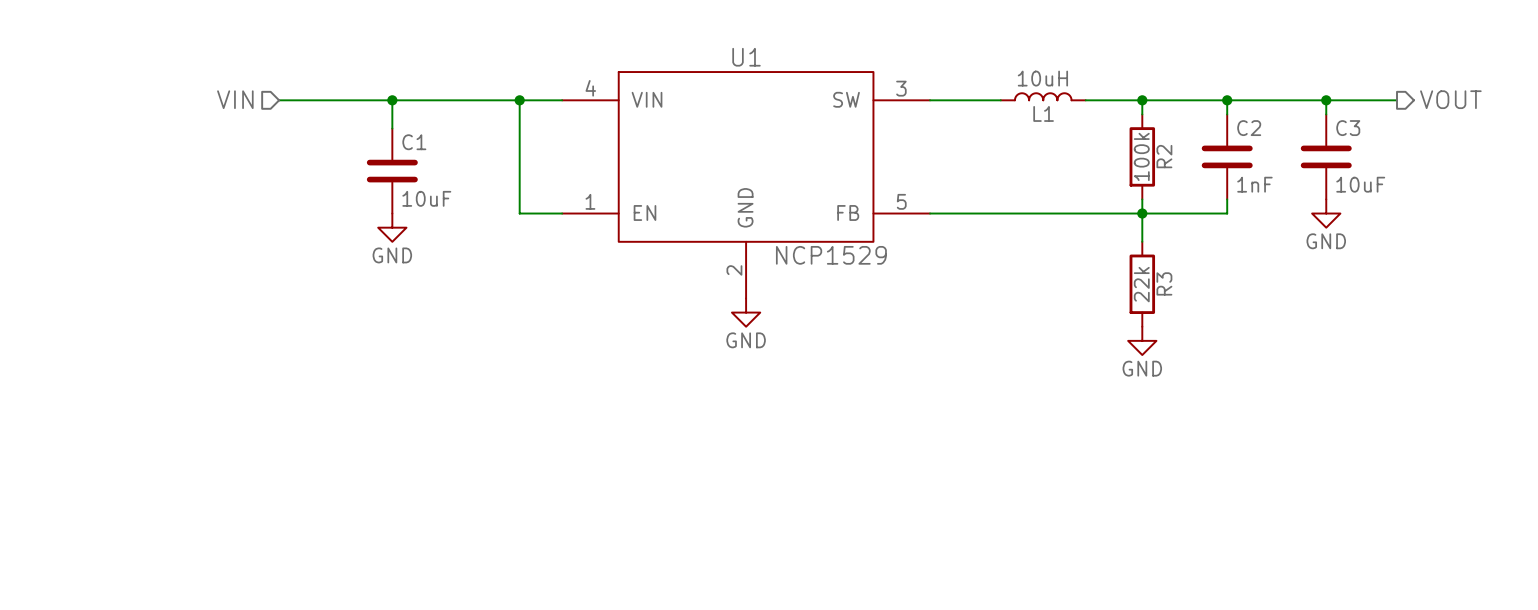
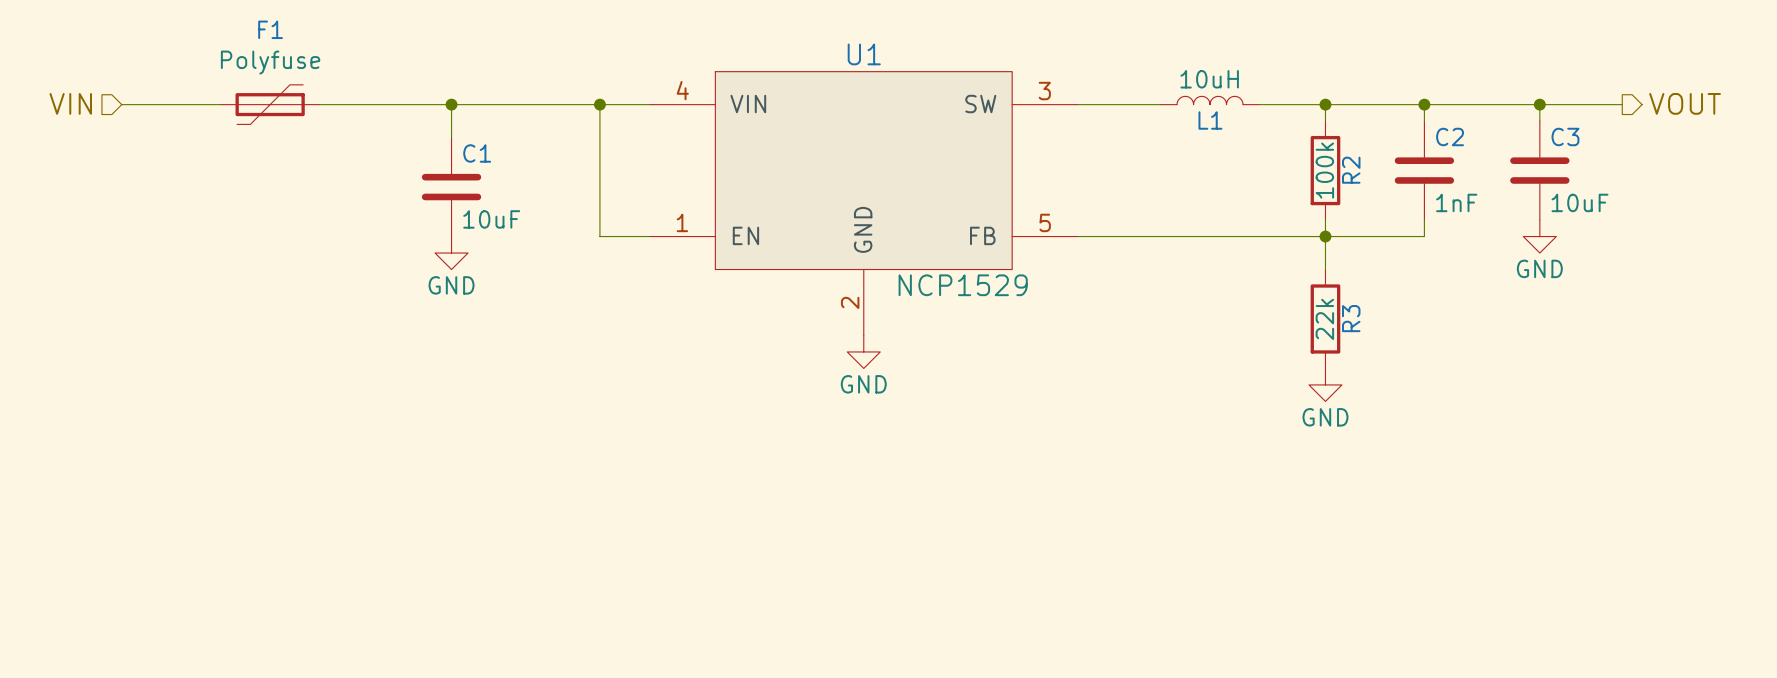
hierarchical label position: VIN (235, 99) -> VIN (70, 103)
wire: none -> (121, 104) (220, 104)
F1: none -> Polyfuse (270, 104)

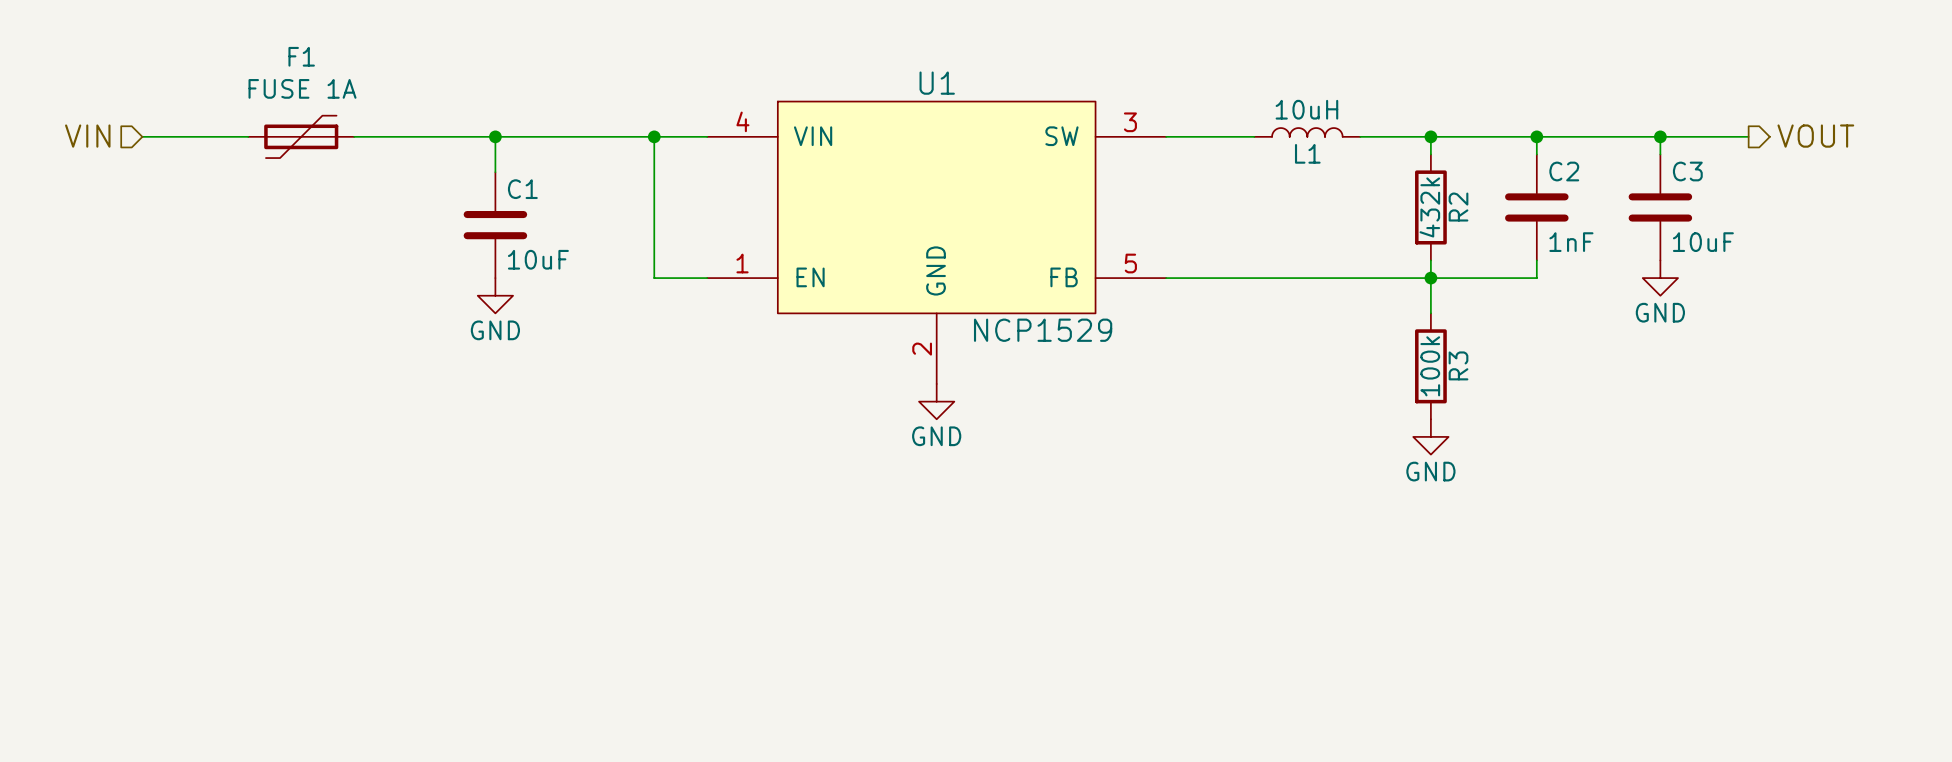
F1 value: Polyfuse (270, 62) -> FUSE 1A (302, 88)
R2 value: 100k (1324, 170) -> 432k (1429, 207)
R3 value: 22k (1324, 319) -> 100k (1430, 366)

